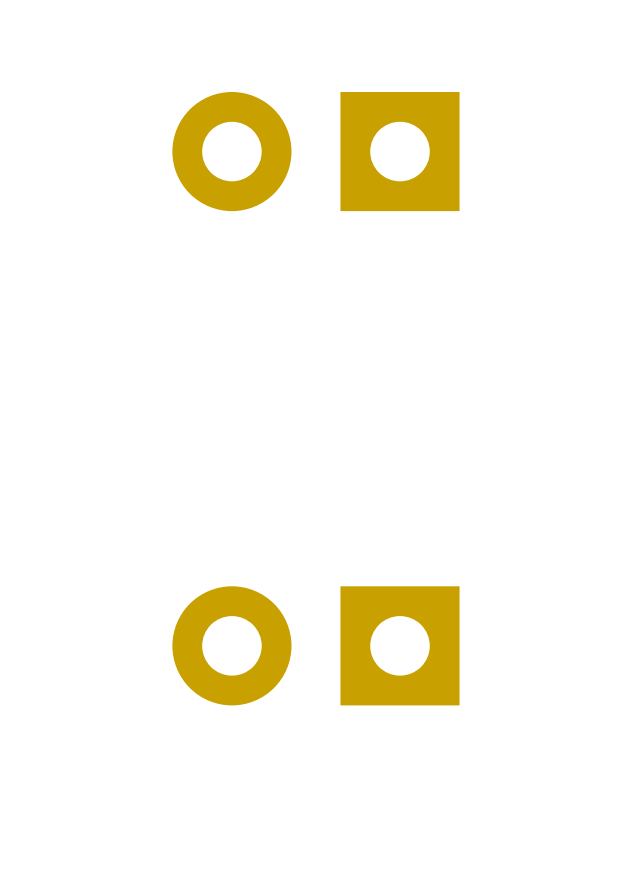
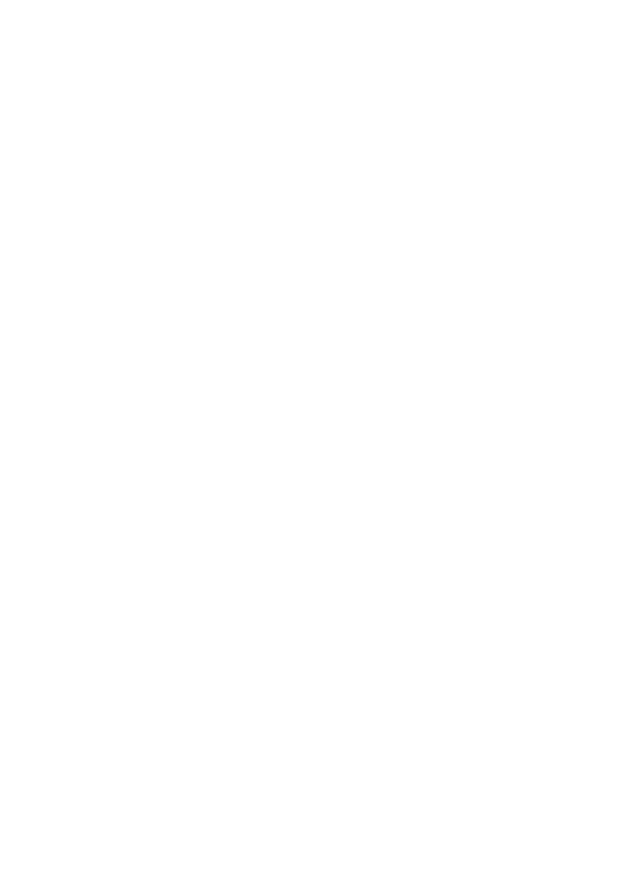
part: (315, 151) -> none
part: (315, 645) -> none

